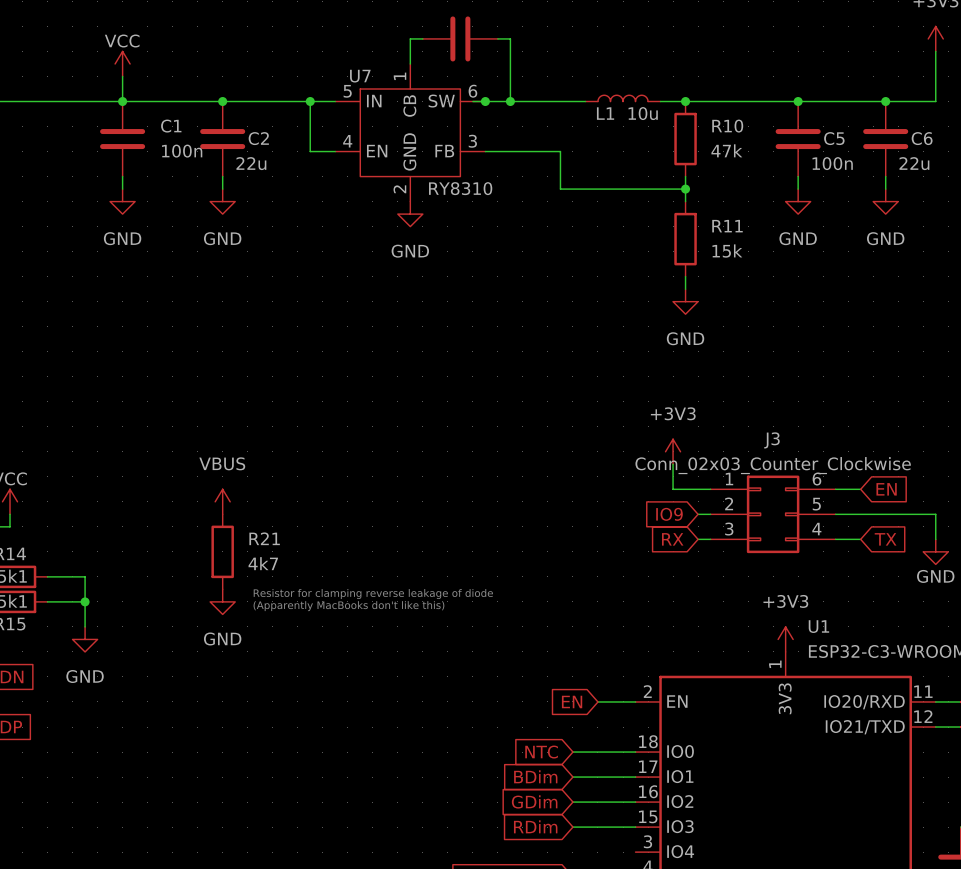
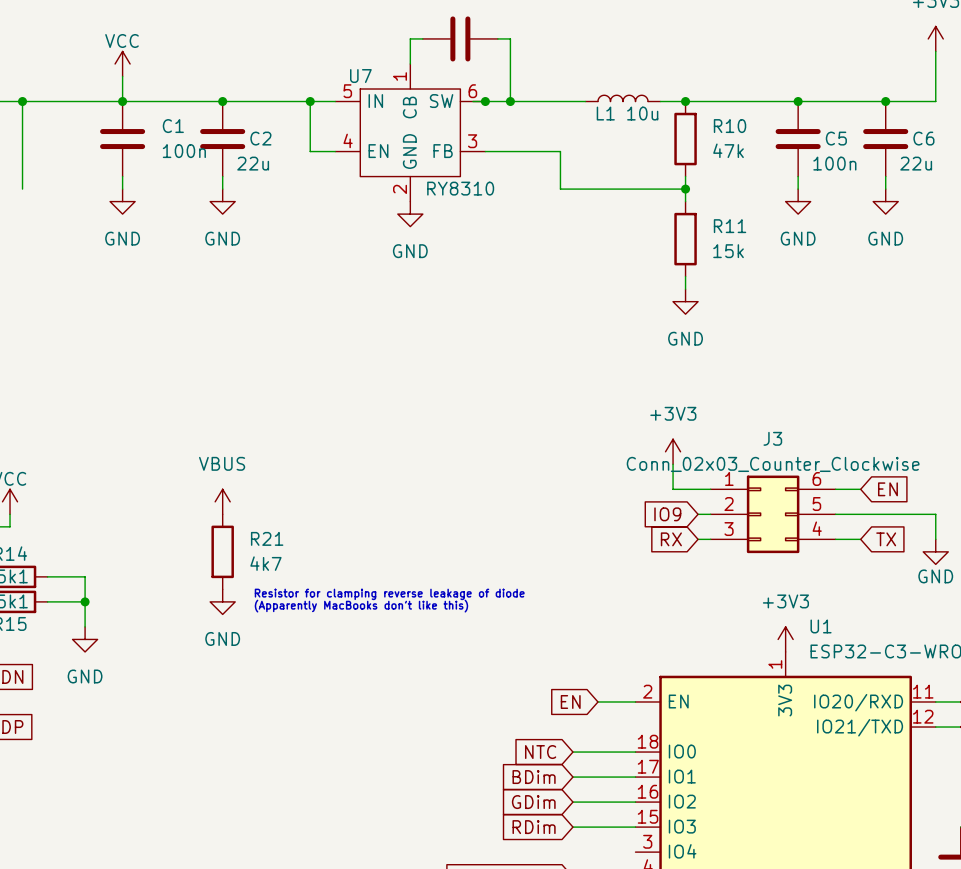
wire: none -> (22, 101) (22, 189)
junction: none -> (22, 101)

